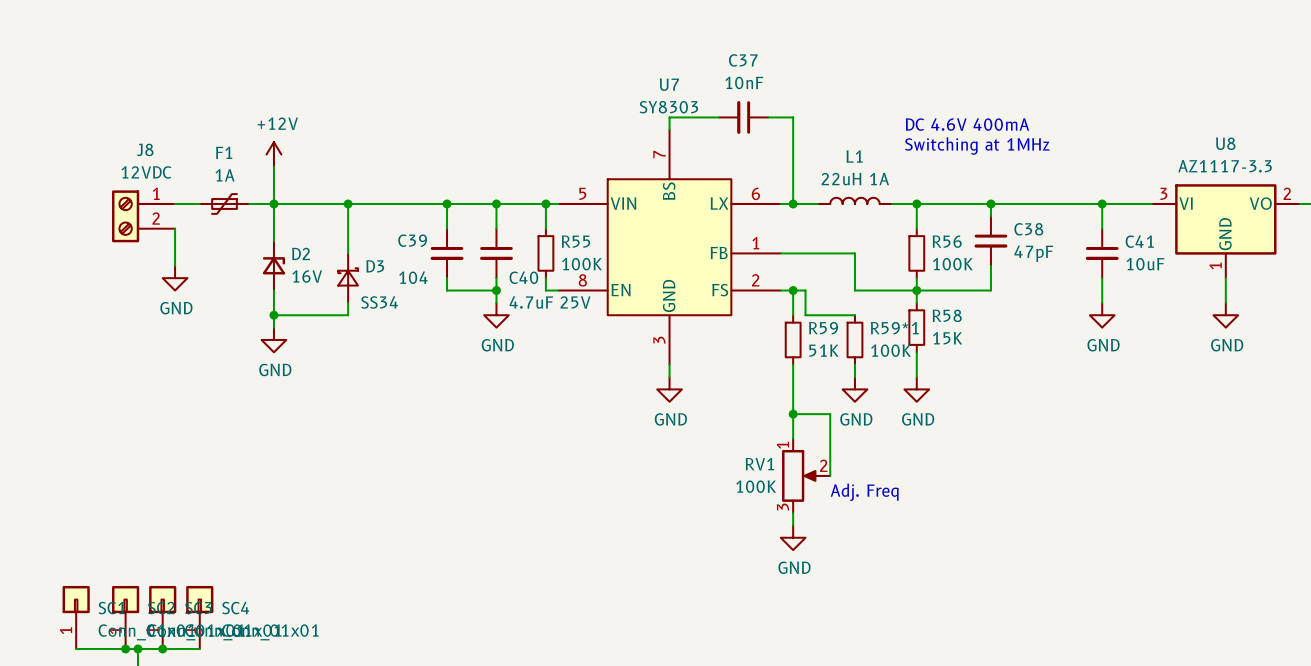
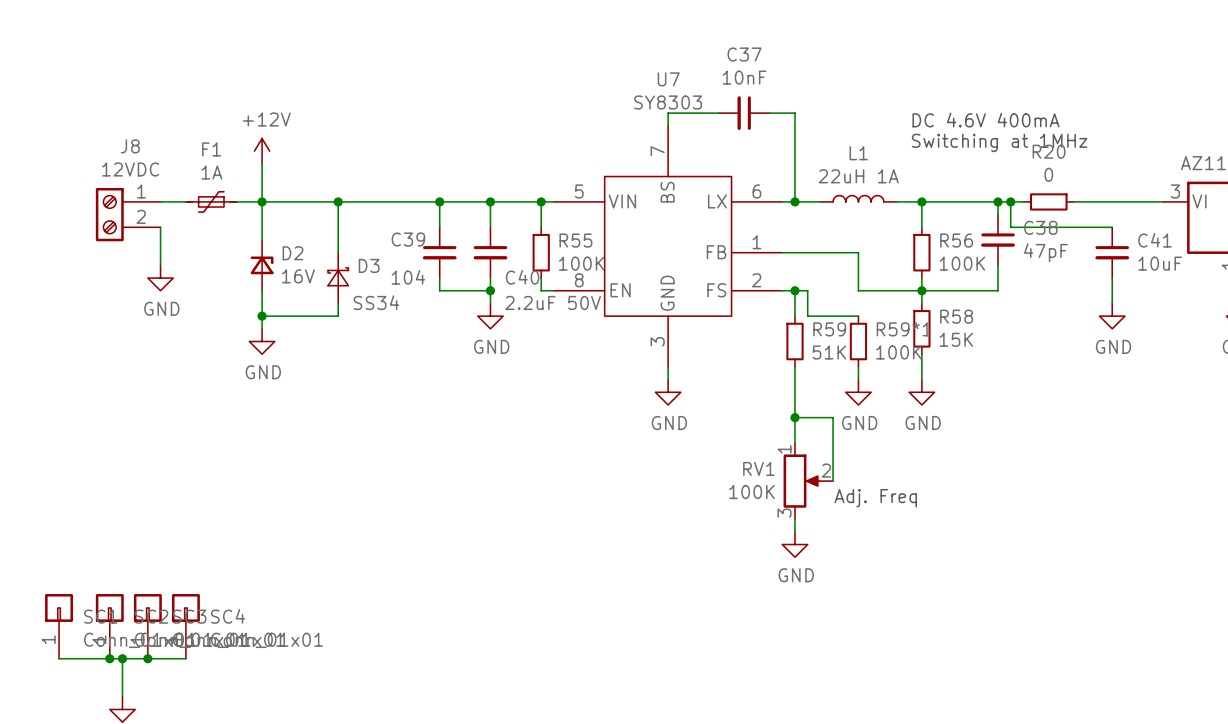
junction: none -> (1010, 201)
wire: (1015, 203) (1065, 203) -> none
R20: none -> 0 (1048, 201)
wire: (1102, 203) (1102, 228) -> (1010, 201) (1010, 227) (1112, 227)
junction: (1102, 203) -> none
C40 value: 4.7uF 25V (550, 302) -> 2.2uF 50V (553, 302)

